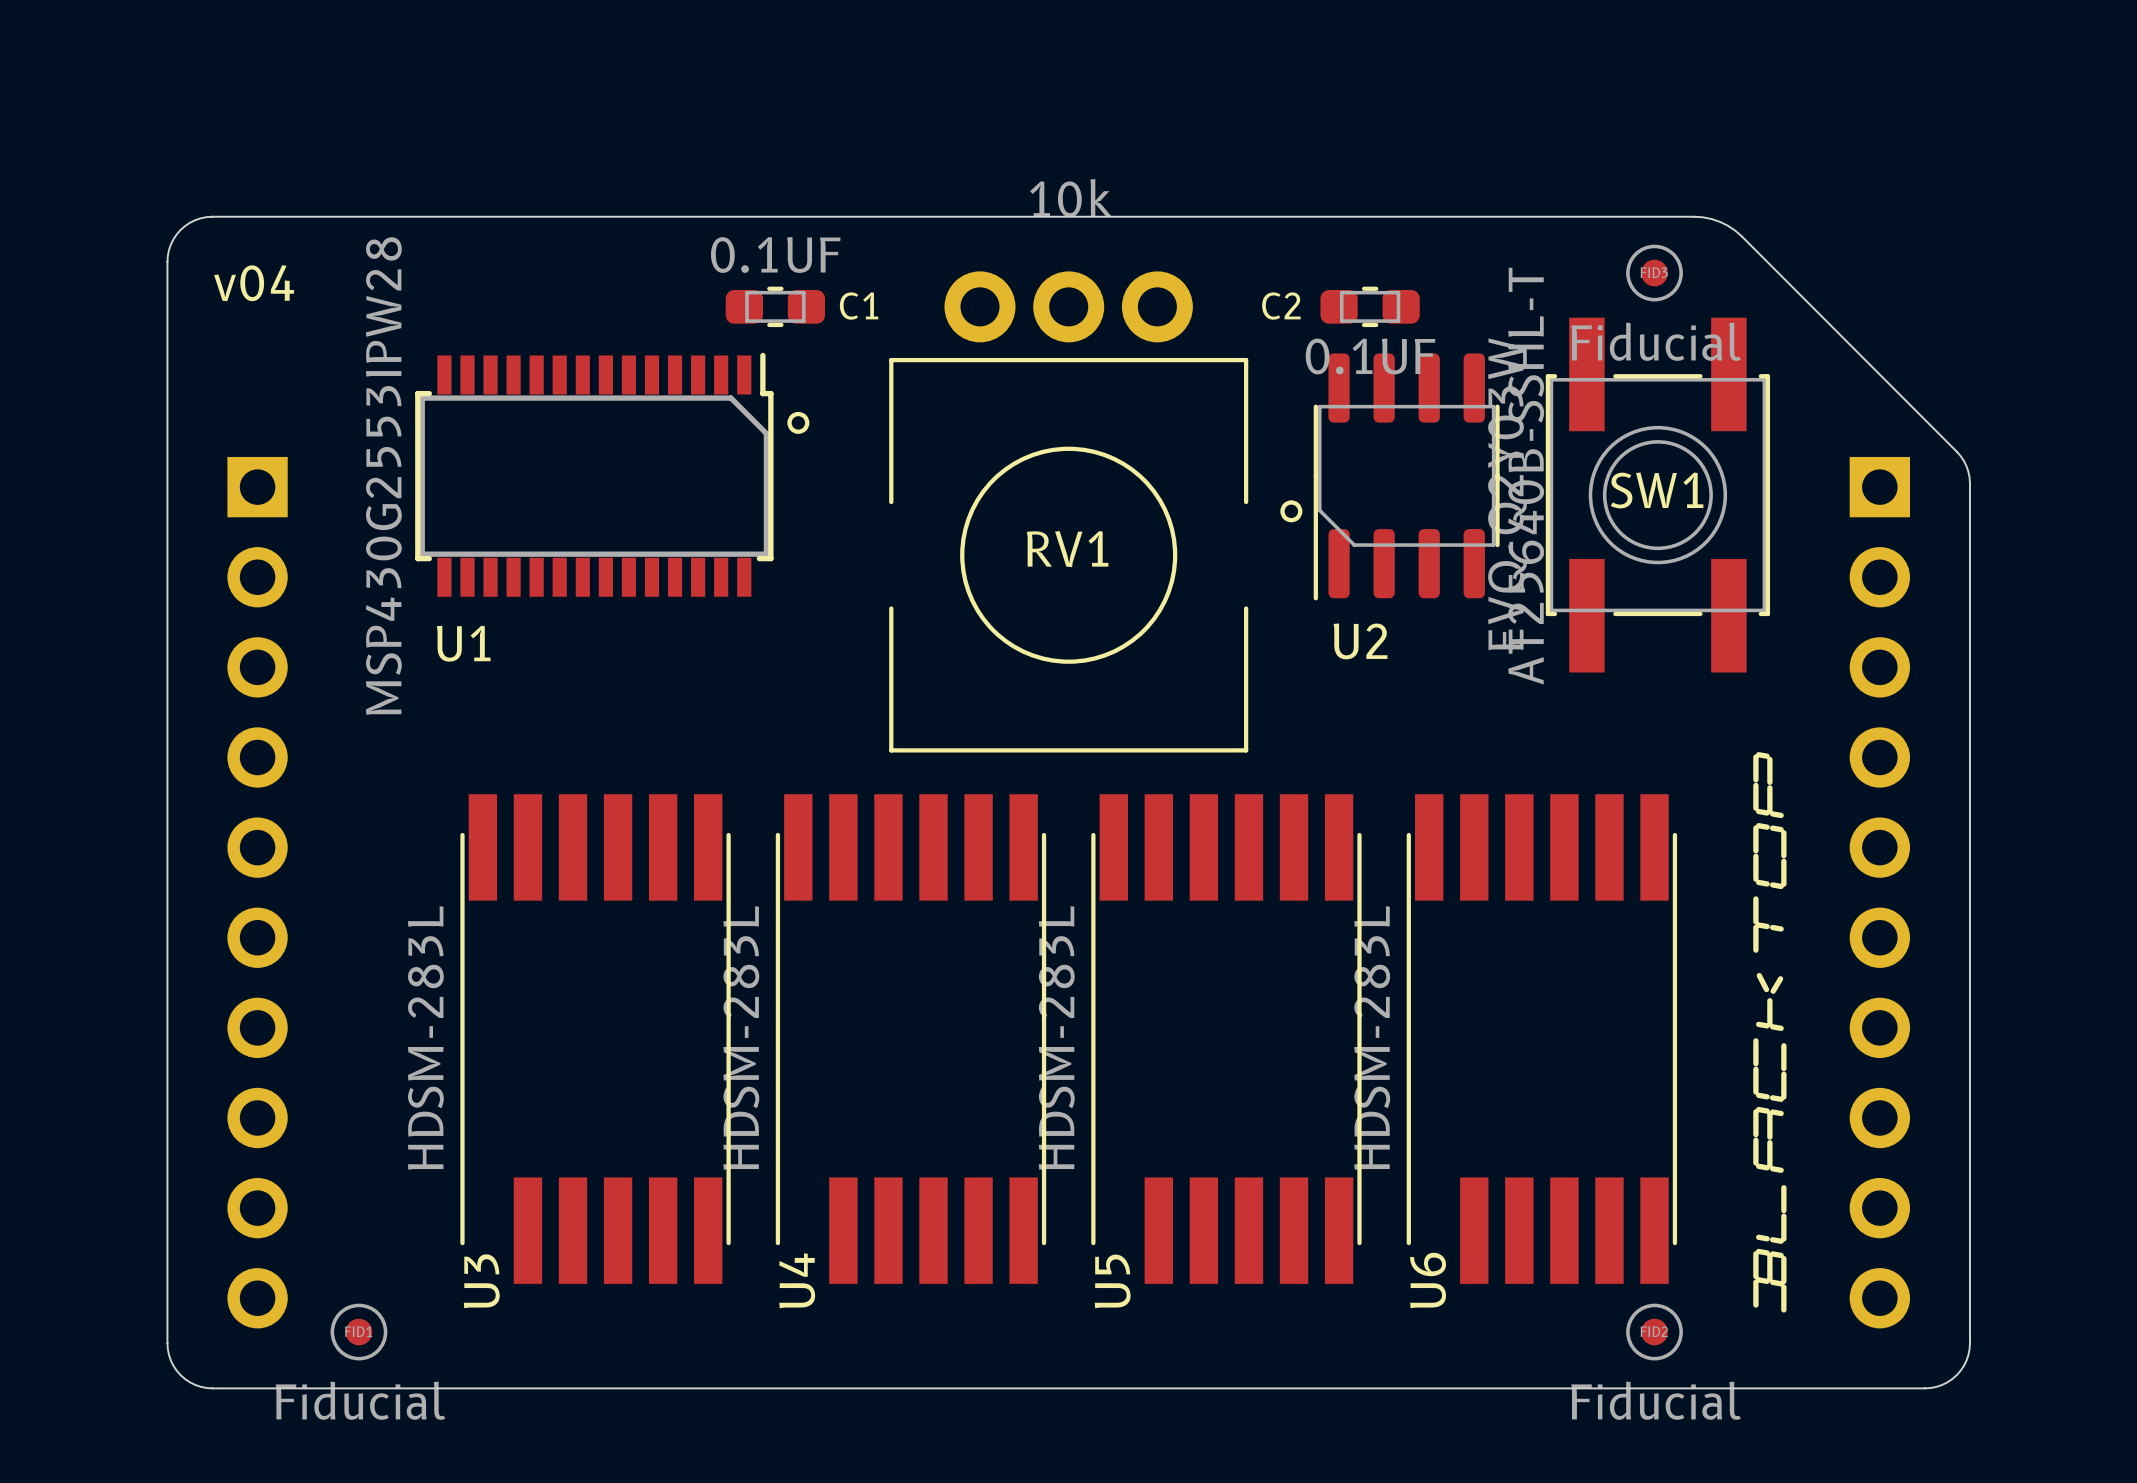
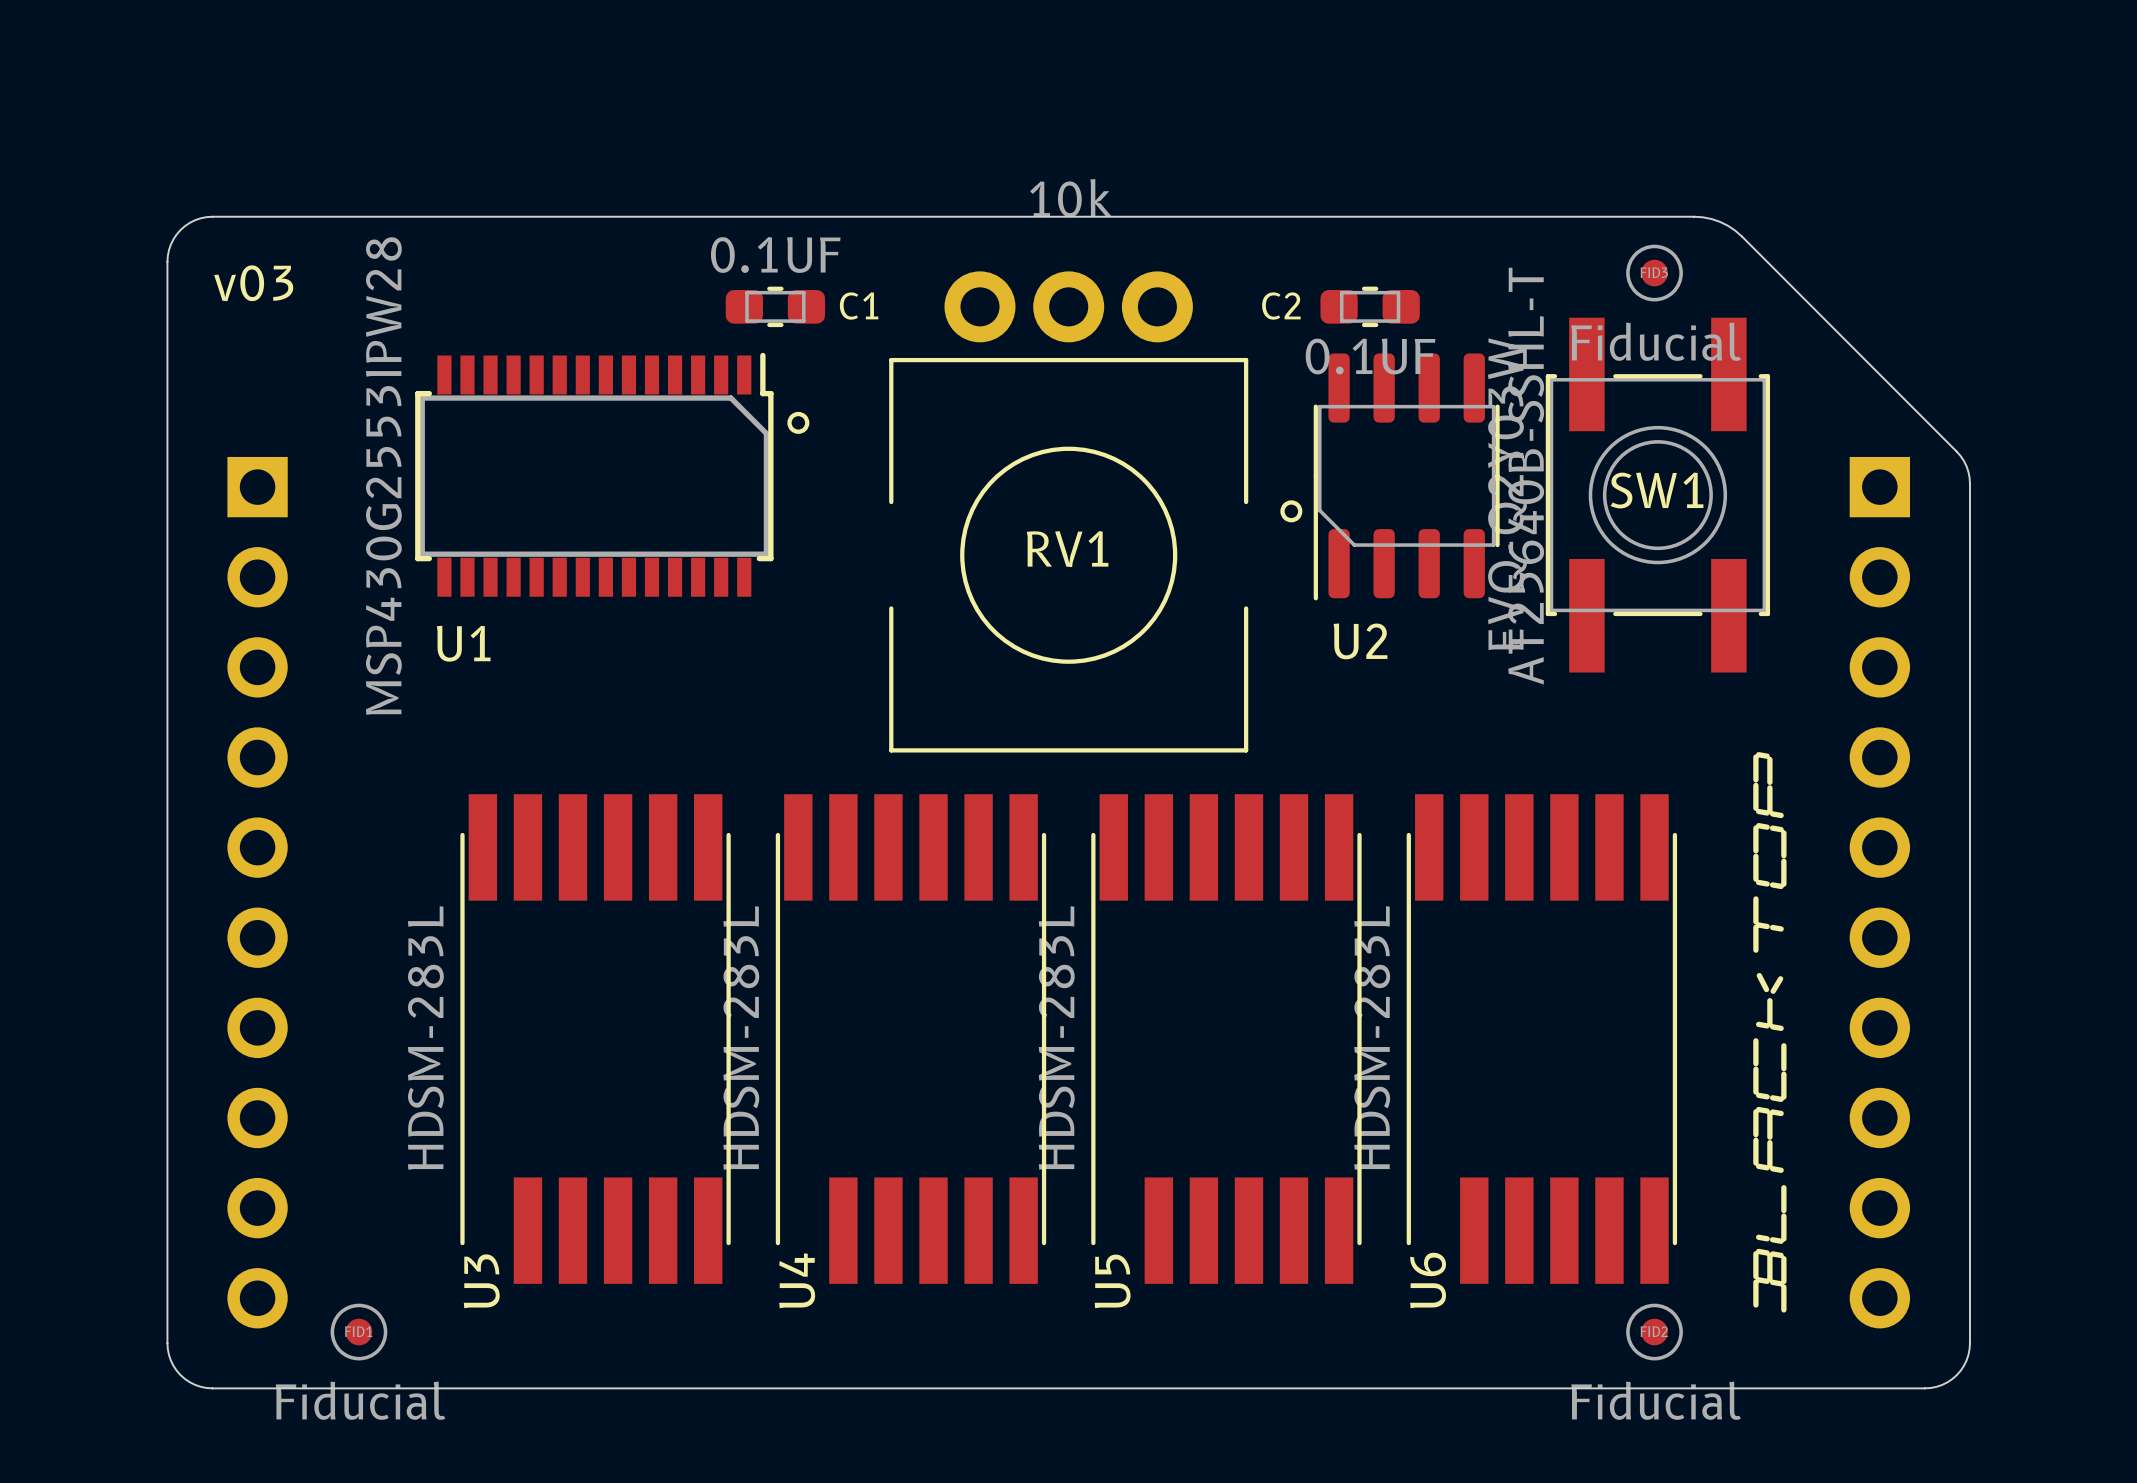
text: v04 (254, 283) -> v03 (253, 283)

